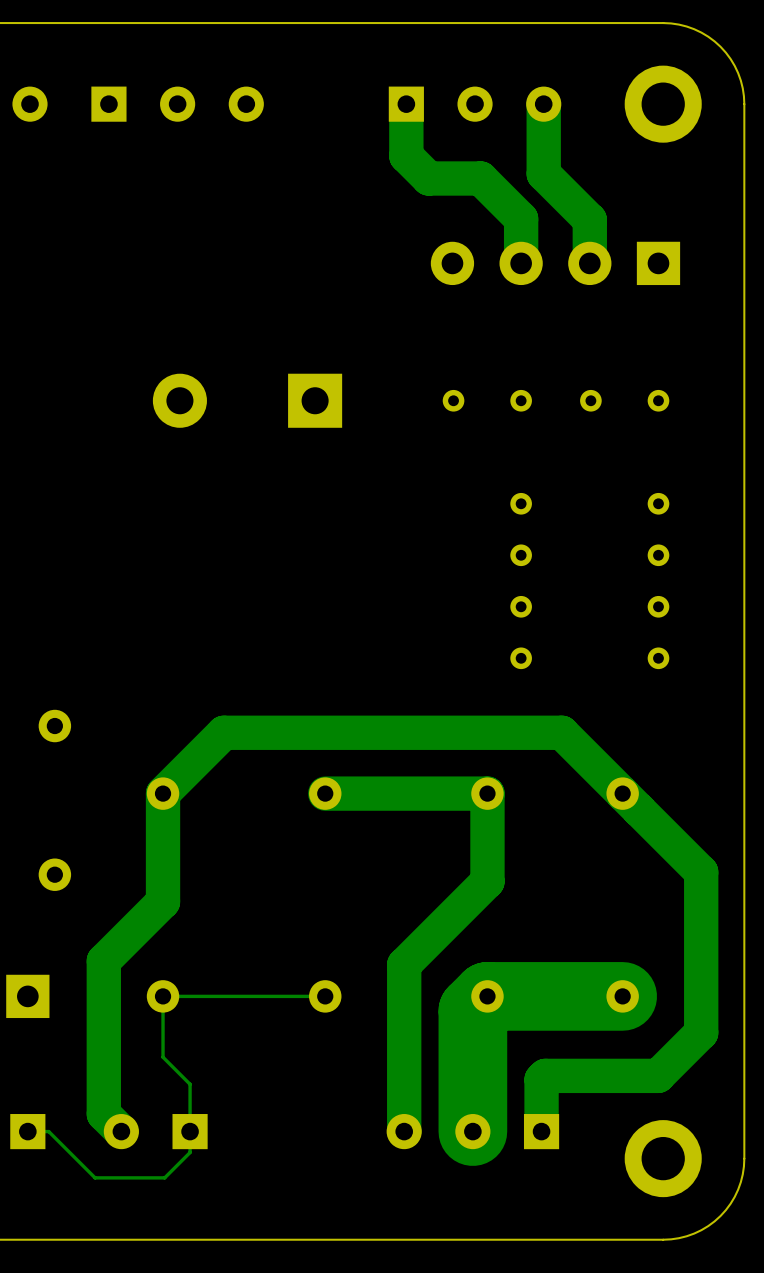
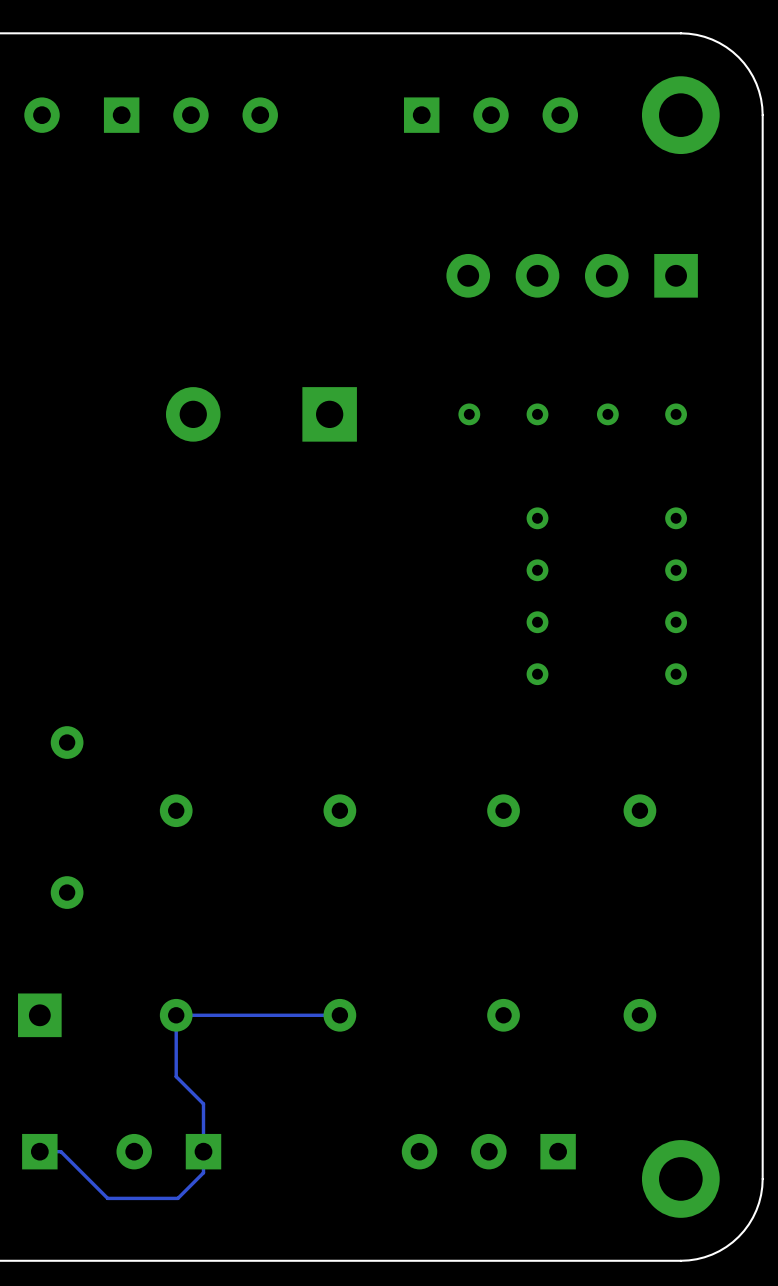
track: (406, 104) (406, 156) (428, 178) (480, 178) (521, 218) (521, 263) -> none
track: (543, 104) (543, 173) (589, 220) (589, 263) -> none
track: (325, 793) (487, 793) (487, 881) (404, 964) (404, 1131) -> none
track: (622, 996) (487, 996) (472, 1010) (472, 1131) -> none
track: (541, 1131) (541, 1079) (545, 1075) (658, 1075) (701, 1032) (701, 872) (561, 732) (223, 732) (163, 793) (163, 901) (103, 960) (103, 1114) (121, 1131) -> none

